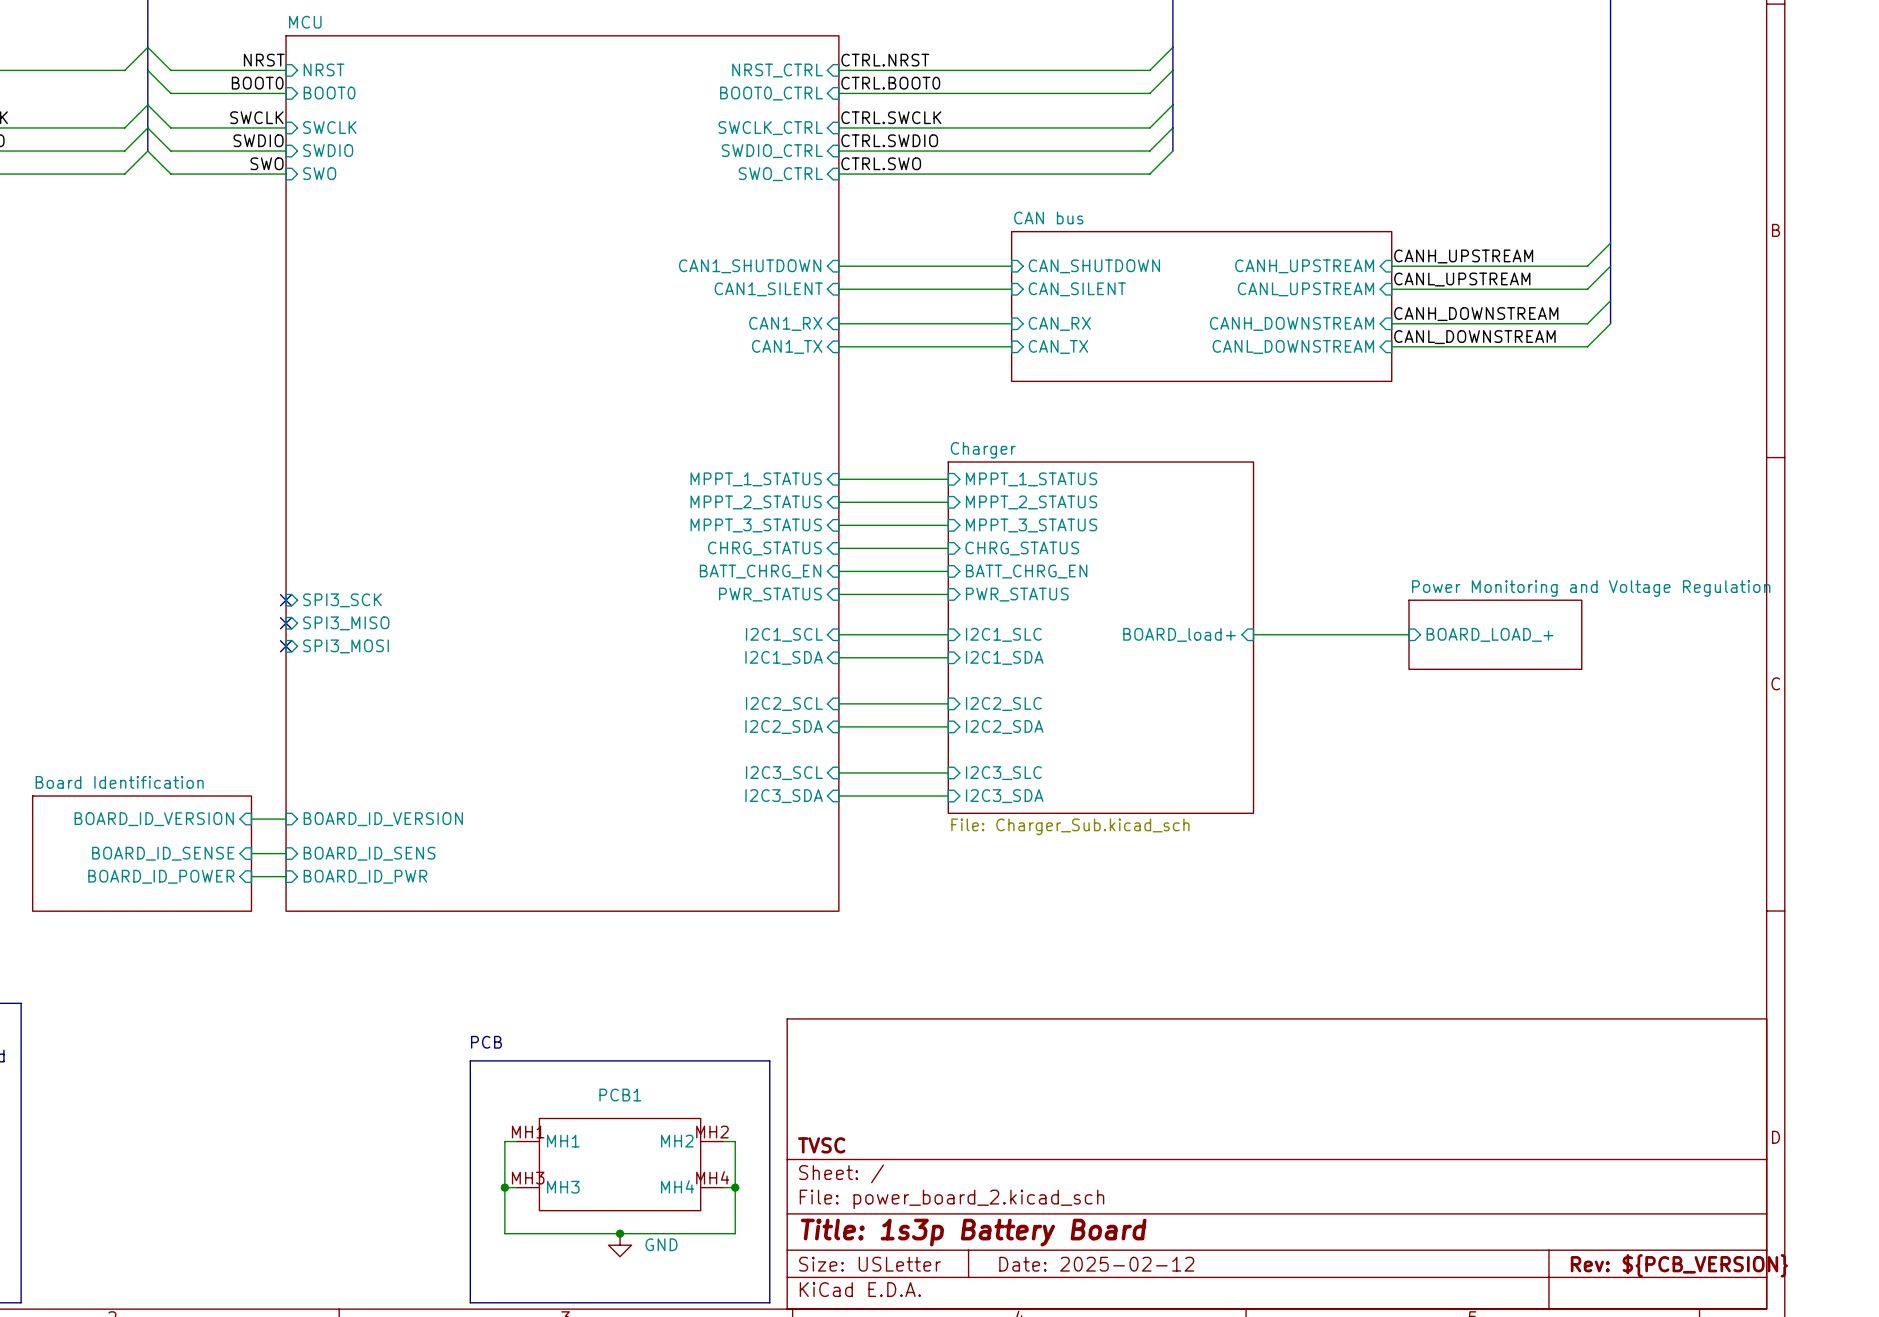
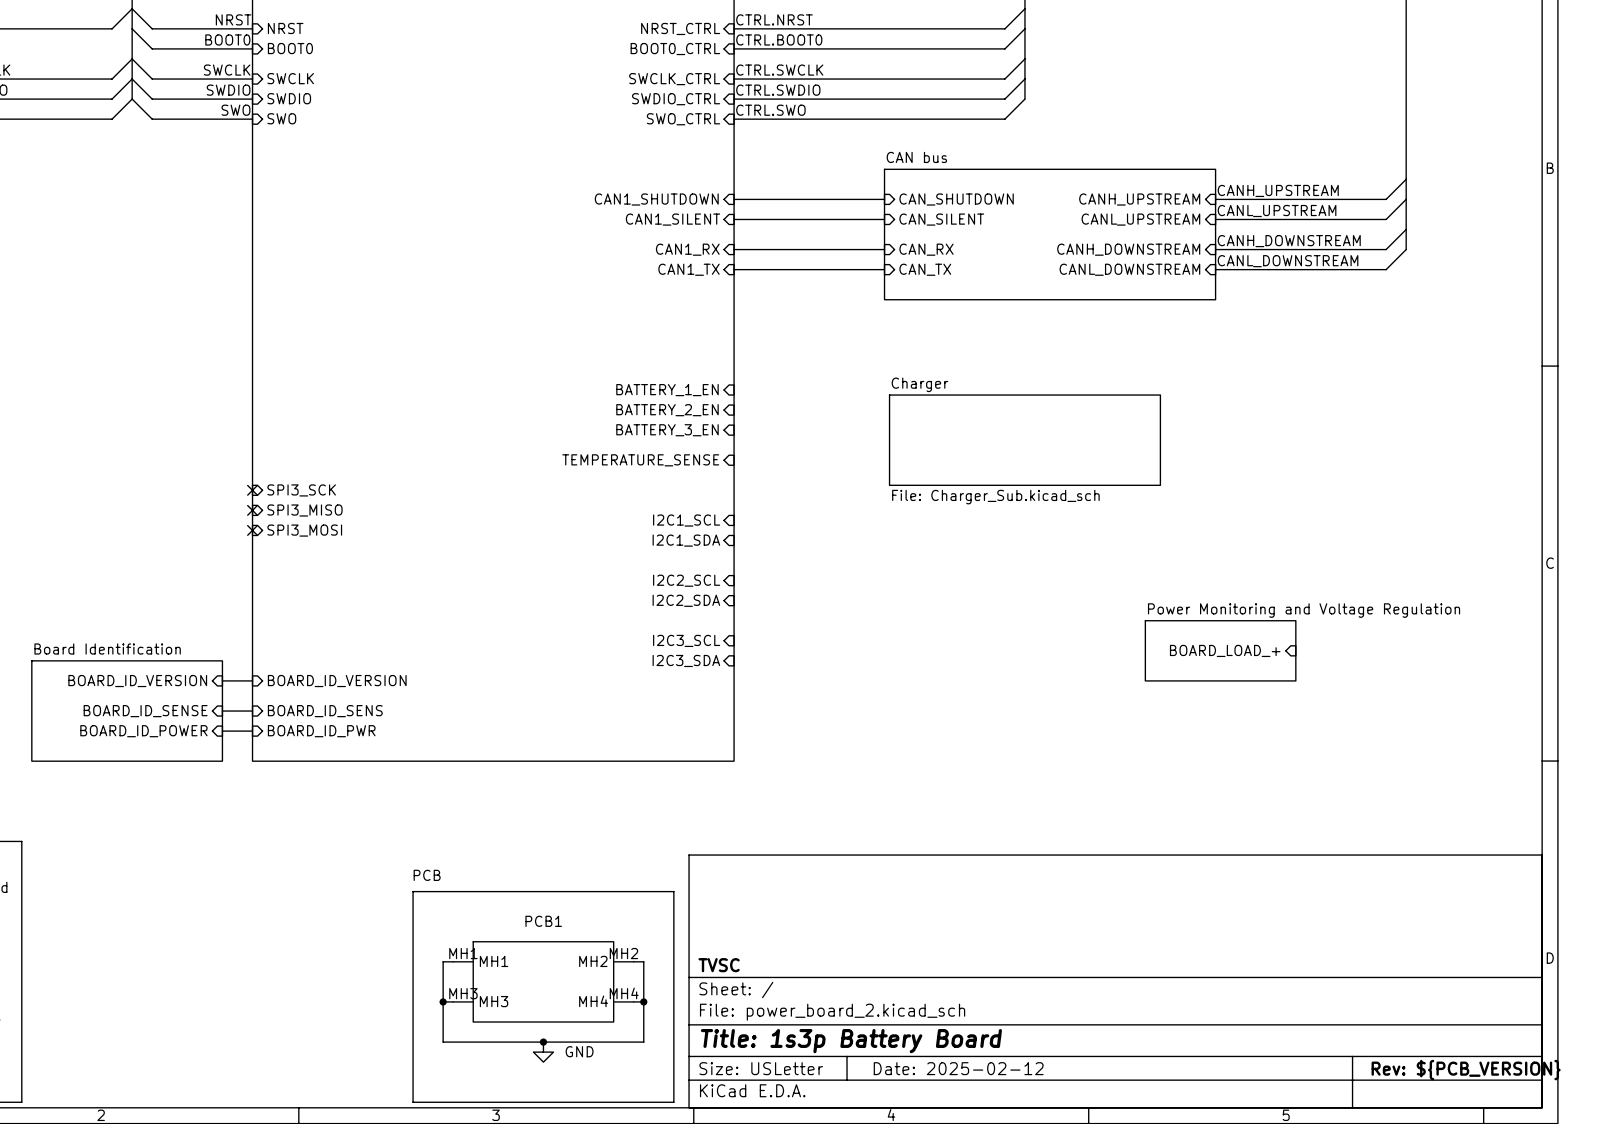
sheet pin: MPPT_1_STATUS (756, 479) -> BATTERY_1_EN (667, 390)
wire: (838, 479) (948, 479) -> none
sheet pin: MPPT_1_STATUS (1031, 479) -> none
sheet pin: MPPT_2_STATUS (756, 502) -> BATTERY_2_EN (667, 410)
wire: (838, 502) (948, 502) -> none
sheet pin: MPPT_2_STATUS (1031, 502) -> none
sheet pin: MPPT_3_STATUS (756, 525) -> BATTERY_3_EN (667, 430)
wire: (838, 525) (948, 525) -> none
sheet pin: MPPT_3_STATUS (1031, 525) -> none
sheet Charger: none -> File: Charger_Sub.kicad_sch (1024, 440)
sheet pin: CHRG_STATUS (764, 548) -> none
wire: (838, 548) (948, 548) -> none
sheet pin: CHRG_STATUS (1022, 548) -> none
sheet pin: BATT_CHRG_EN (760, 571) -> TEMPERATURE_SENSE (640, 460)
wire: (838, 571) (948, 571) -> none
sheet pin: BATT_CHRG_EN (1026, 571) -> none
sheet pin: PWR_STATUS (770, 594) -> none
wire: (838, 594) (948, 594) -> none
sheet pin: PWR_STATUS (1017, 594) -> none
wire: (838, 634) (948, 634) -> none
sheet pin: I2C1_SLC (1003, 634) -> none
sheet pin: BOARD_load+ (1179, 634) -> none
wire: (1253, 634) (1409, 634) -> none
sheet pin rotation: 0° (1490, 634) -> 180° (1225, 650)
sheet pin position: BOARD_LOAD_+ (1490, 634) -> BOARD_LOAD_+ (1225, 650)
sheet Power Monitoring and Voltage Regulation position: (1495, 634) -> (1220, 650)
sheet Charger: File: Charger_Sub.kicad_sch (1100, 637) -> none
wire: (838, 657) (948, 657) -> none
sheet pin: I2C1_SDA (1004, 657) -> none
wire: (838, 703) (948, 703) -> none
sheet pin: I2C2_SLC (1003, 703) -> none
wire: (838, 726) (948, 726) -> none
sheet pin: I2C2_SDA (1004, 727) -> none
wire: (838, 772) (948, 772) -> none
sheet pin: I2C3_SLC (1003, 773) -> none
wire: (838, 796) (948, 796) -> none
sheet pin: I2C3_SDA (1004, 796) -> none

